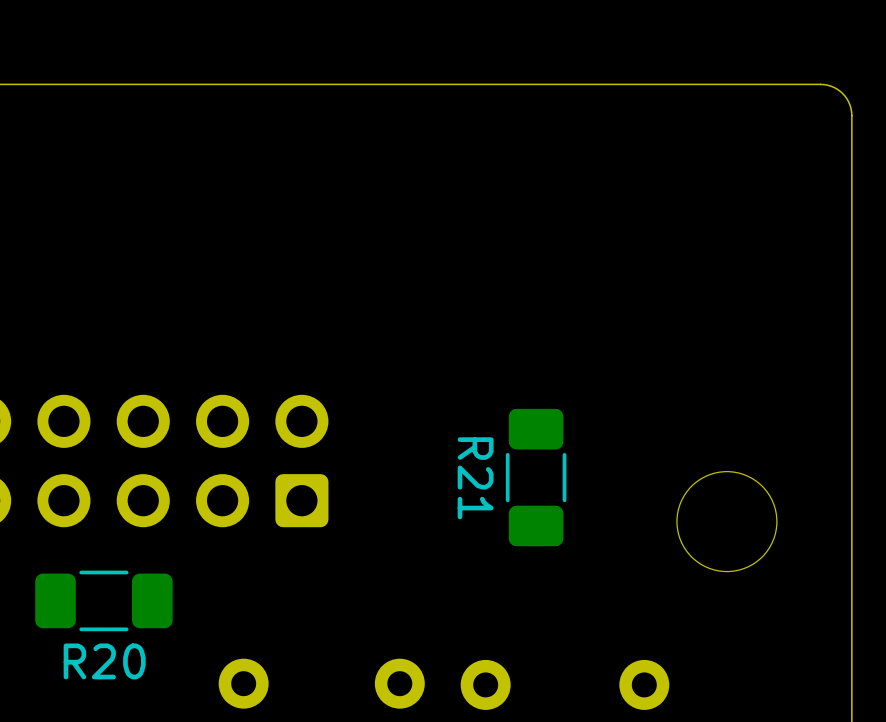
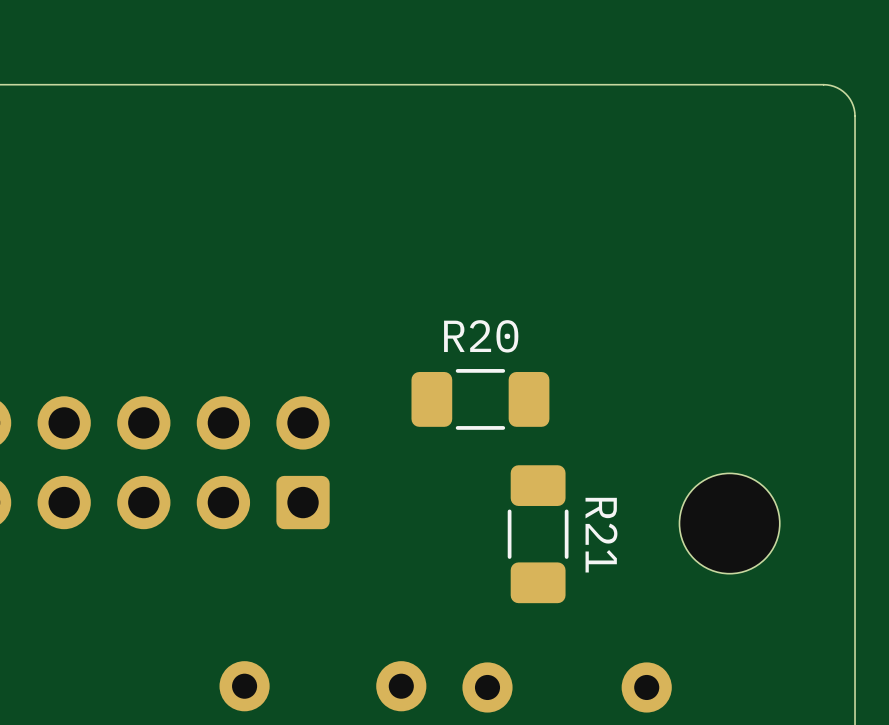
R21 position: (536, 477) -> (538, 534)
R21 name position: R21 (475, 478) -> R21 (601, 535)
R20 position: (103, 600) -> (480, 399)
R20 name position: R20 (104, 661) -> R20 (481, 336)

